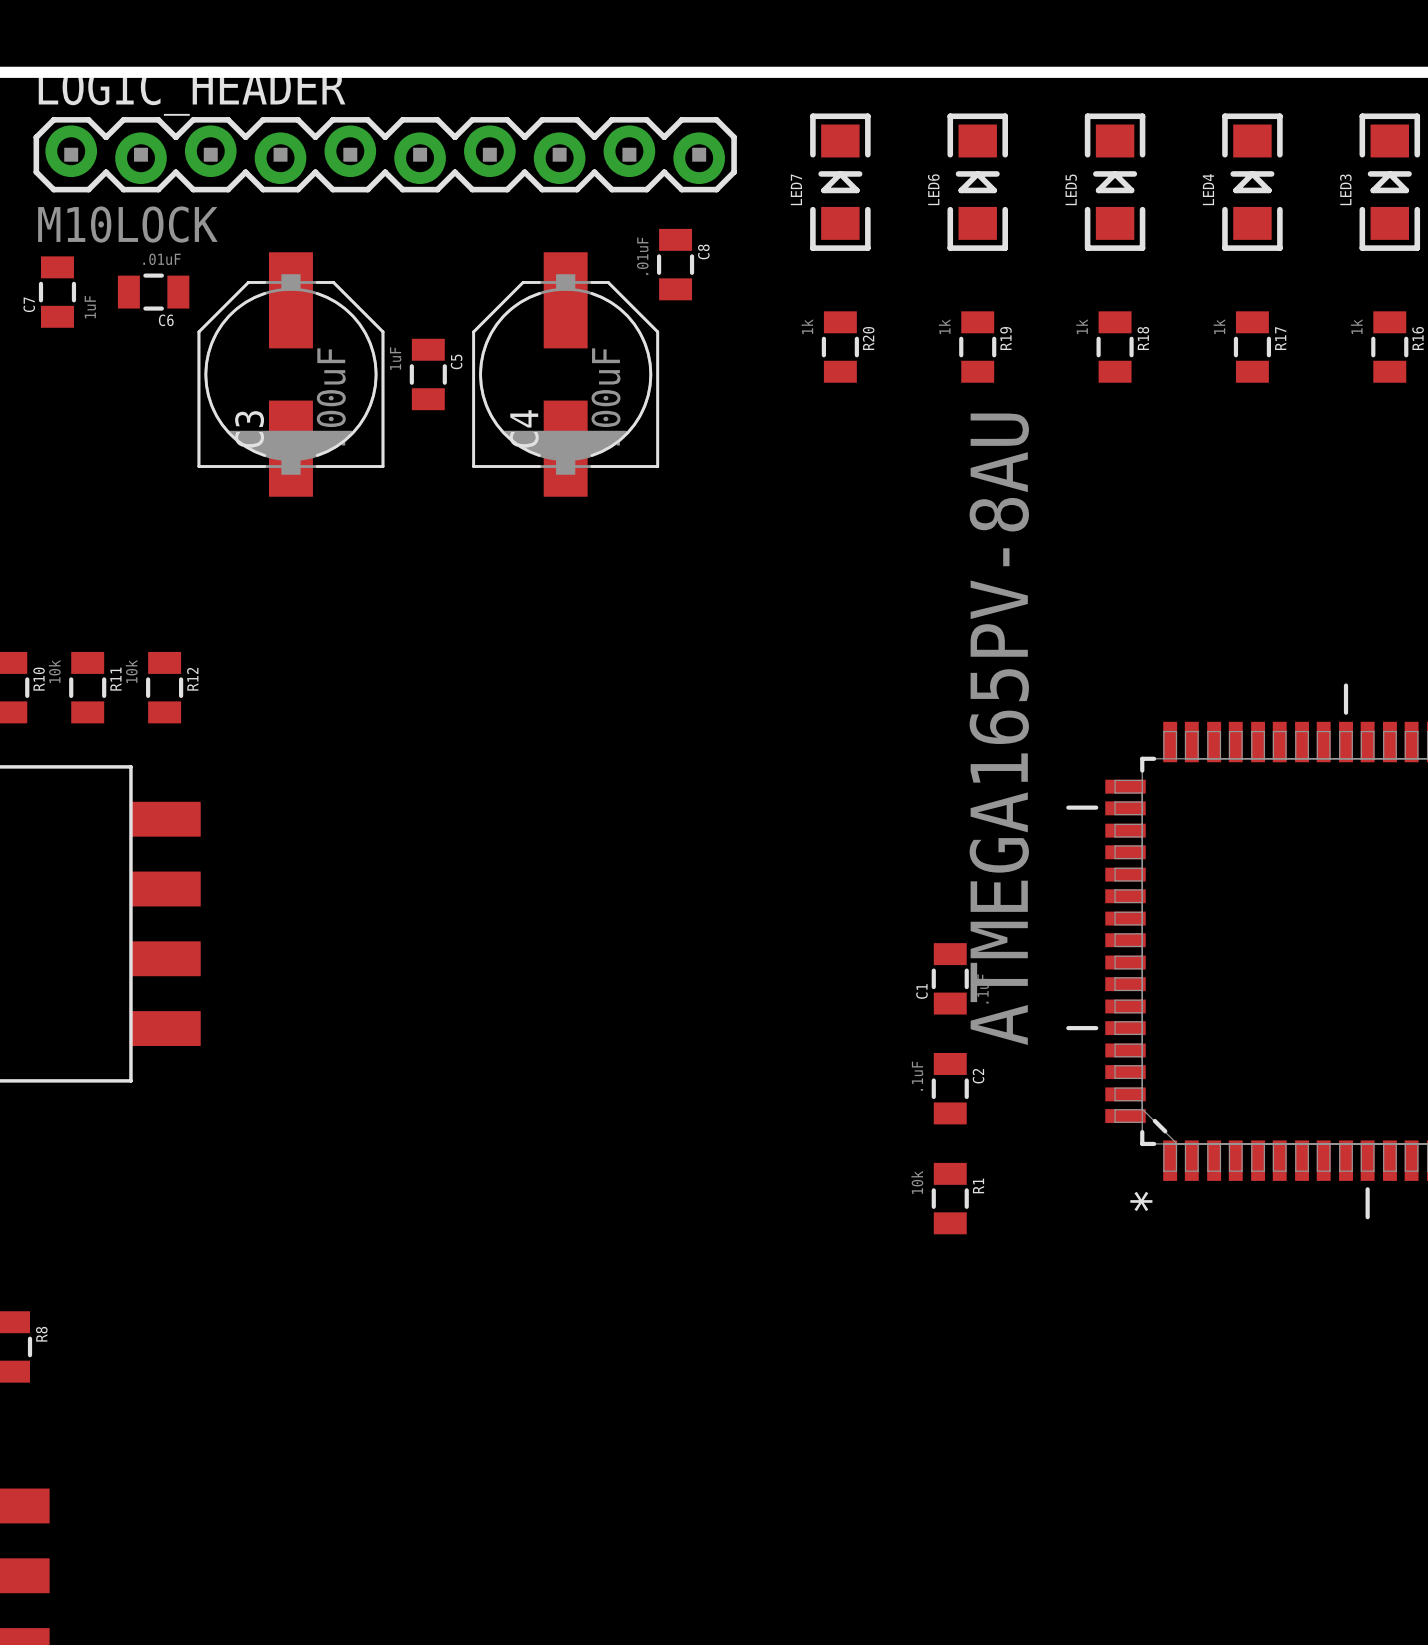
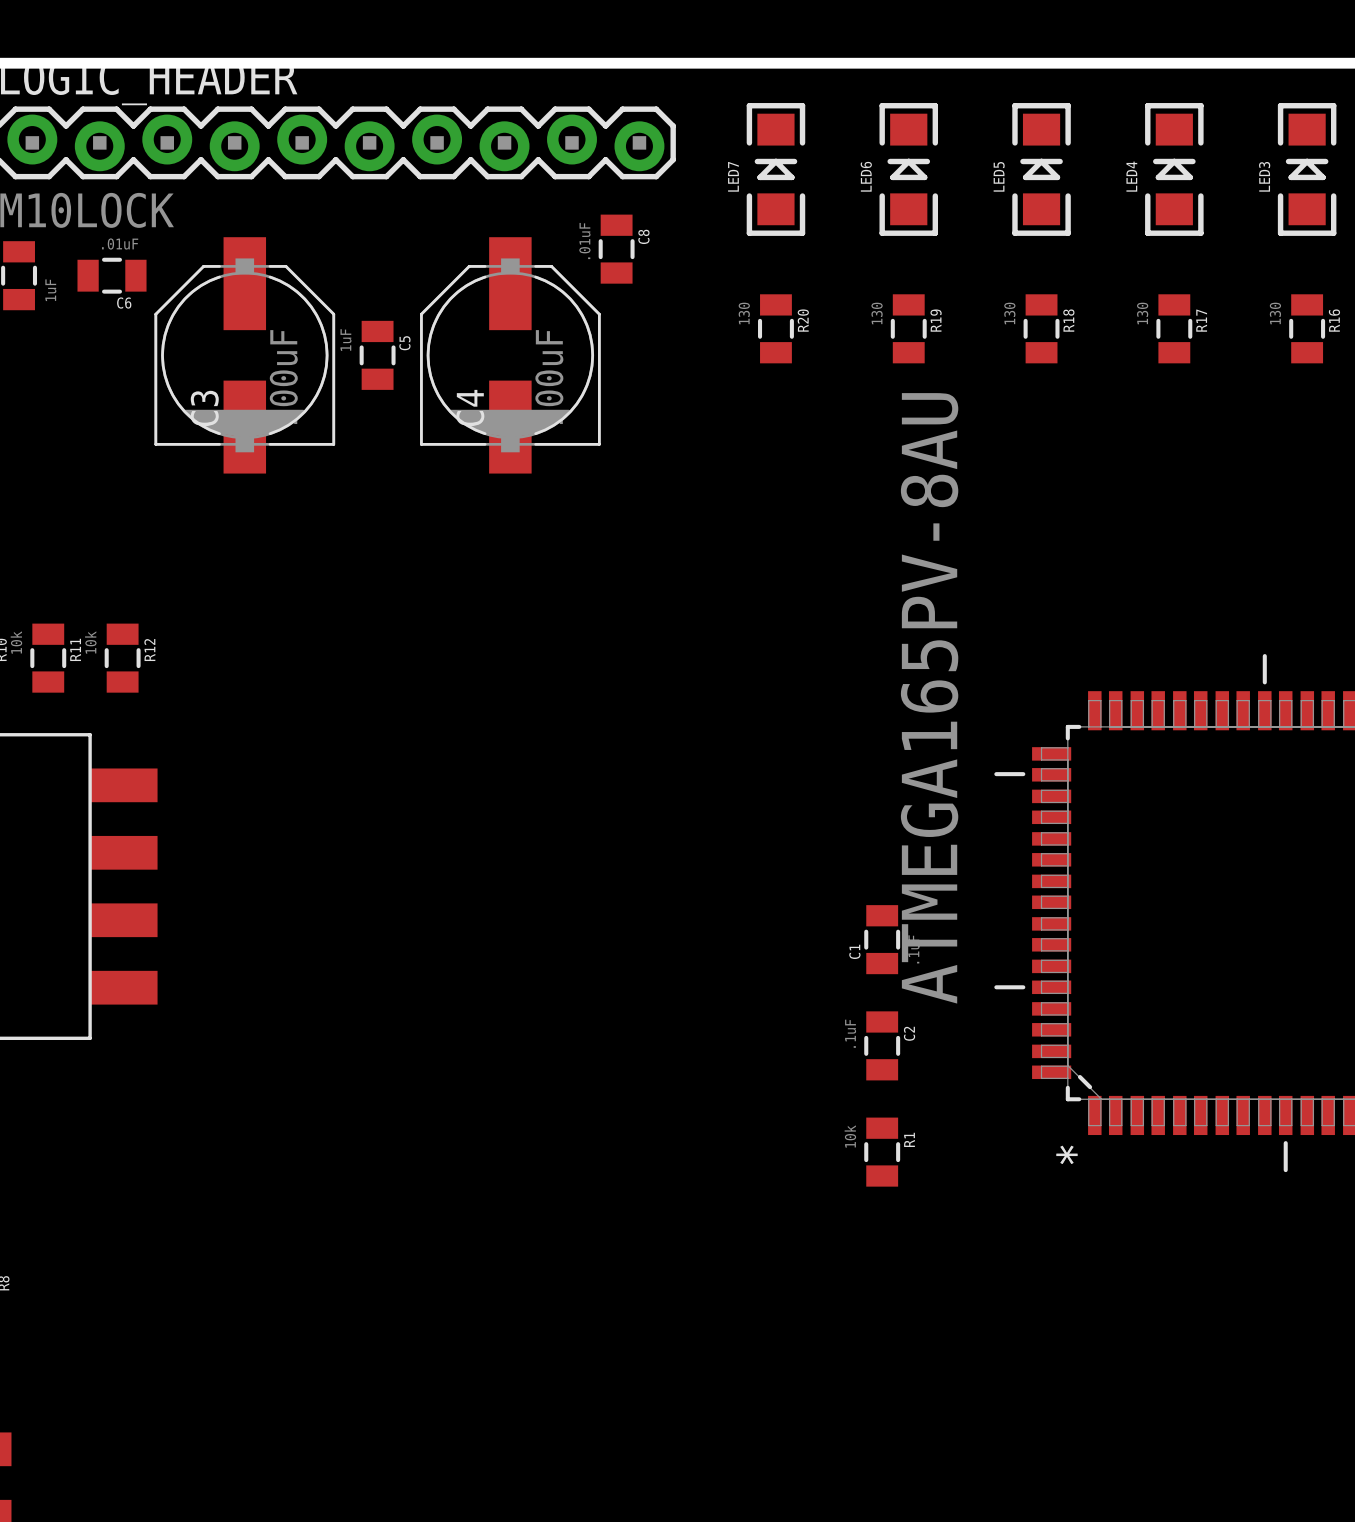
R20 value: 1k (807, 326) -> 130 (744, 313)
R19 value: 1k (944, 326) -> 130 (877, 313)
R18 value: 1k (1082, 326) -> 130 (1009, 313)
R17 value: 1k (1219, 326) -> 130 (1142, 313)
R16 value: 1k (1356, 326) -> 130 (1275, 313)

